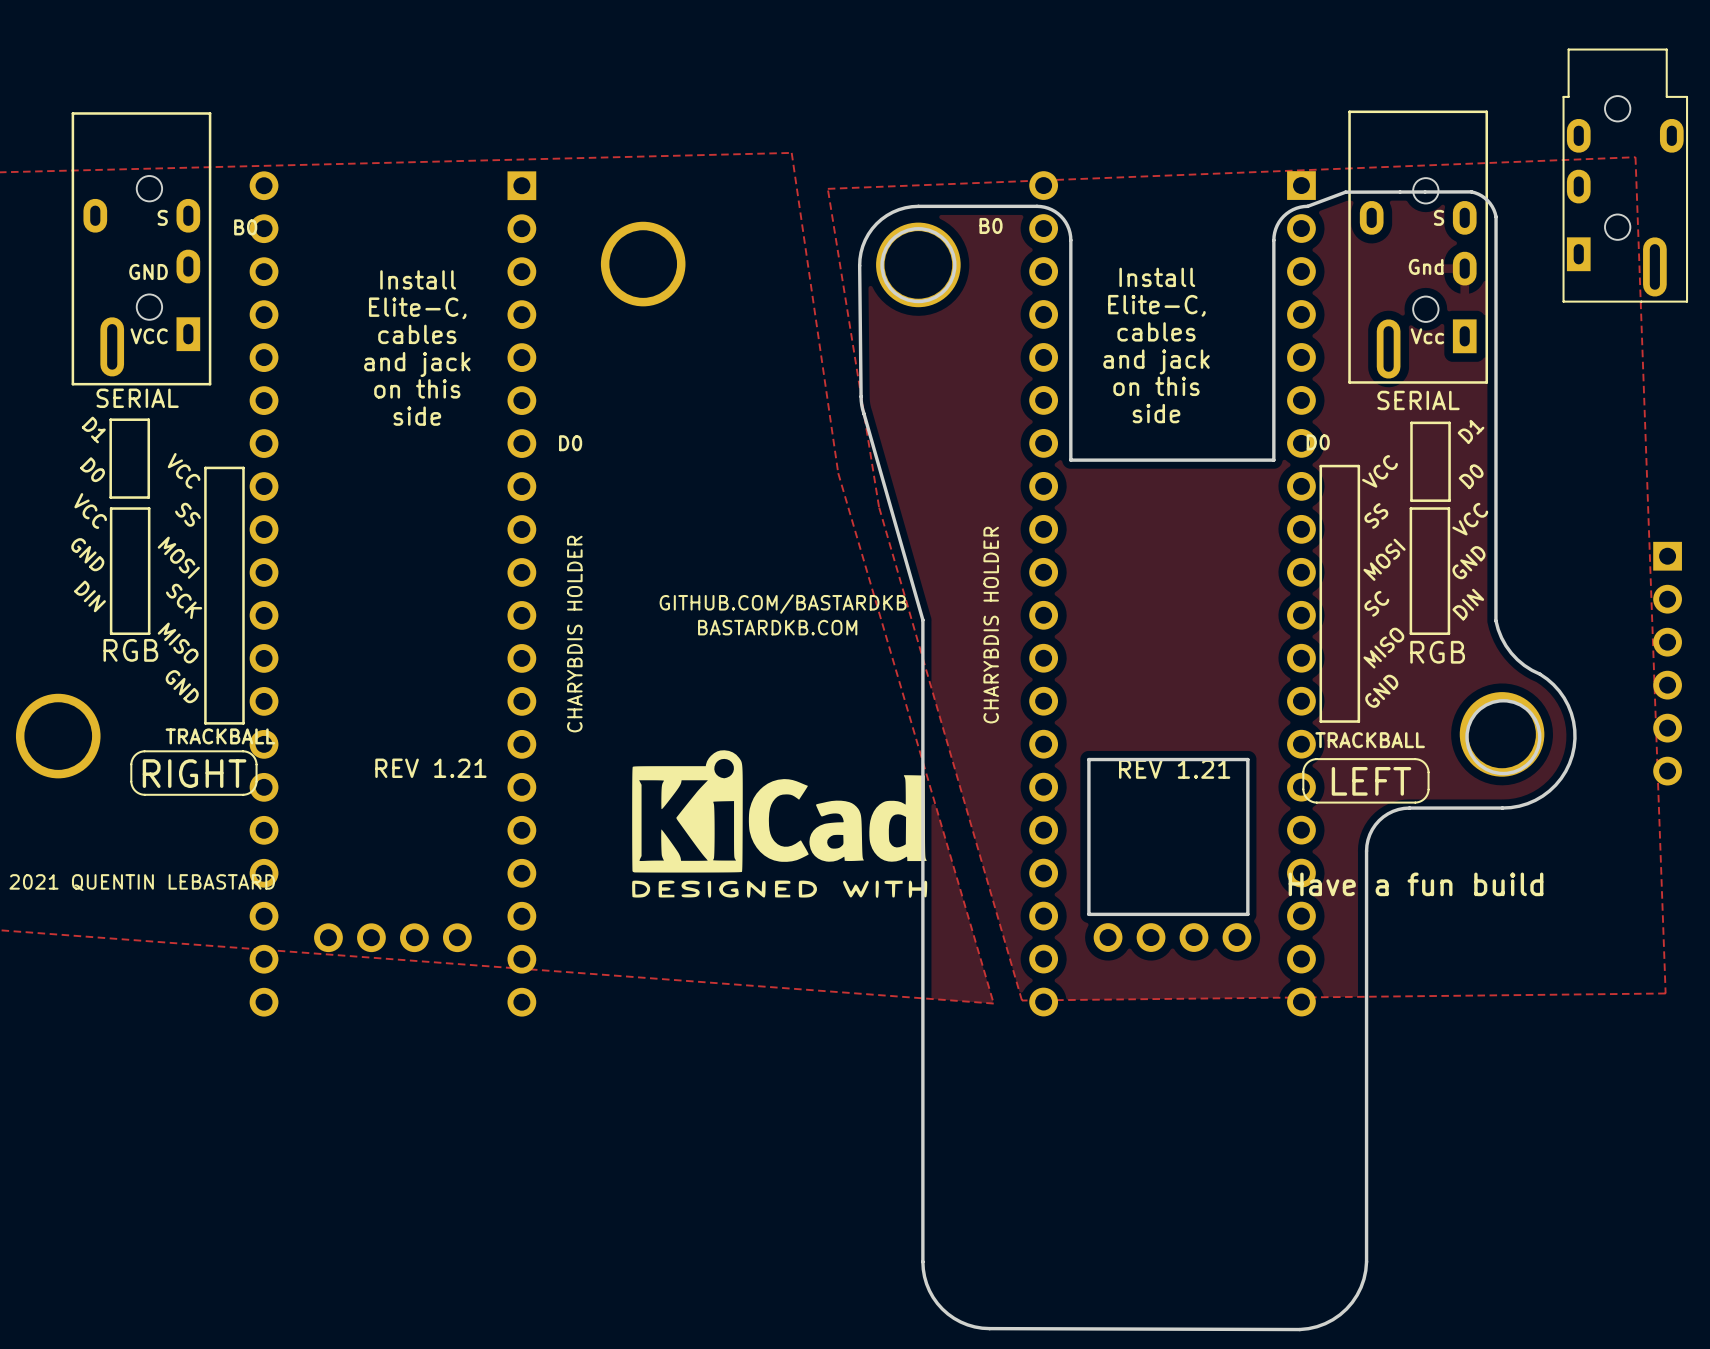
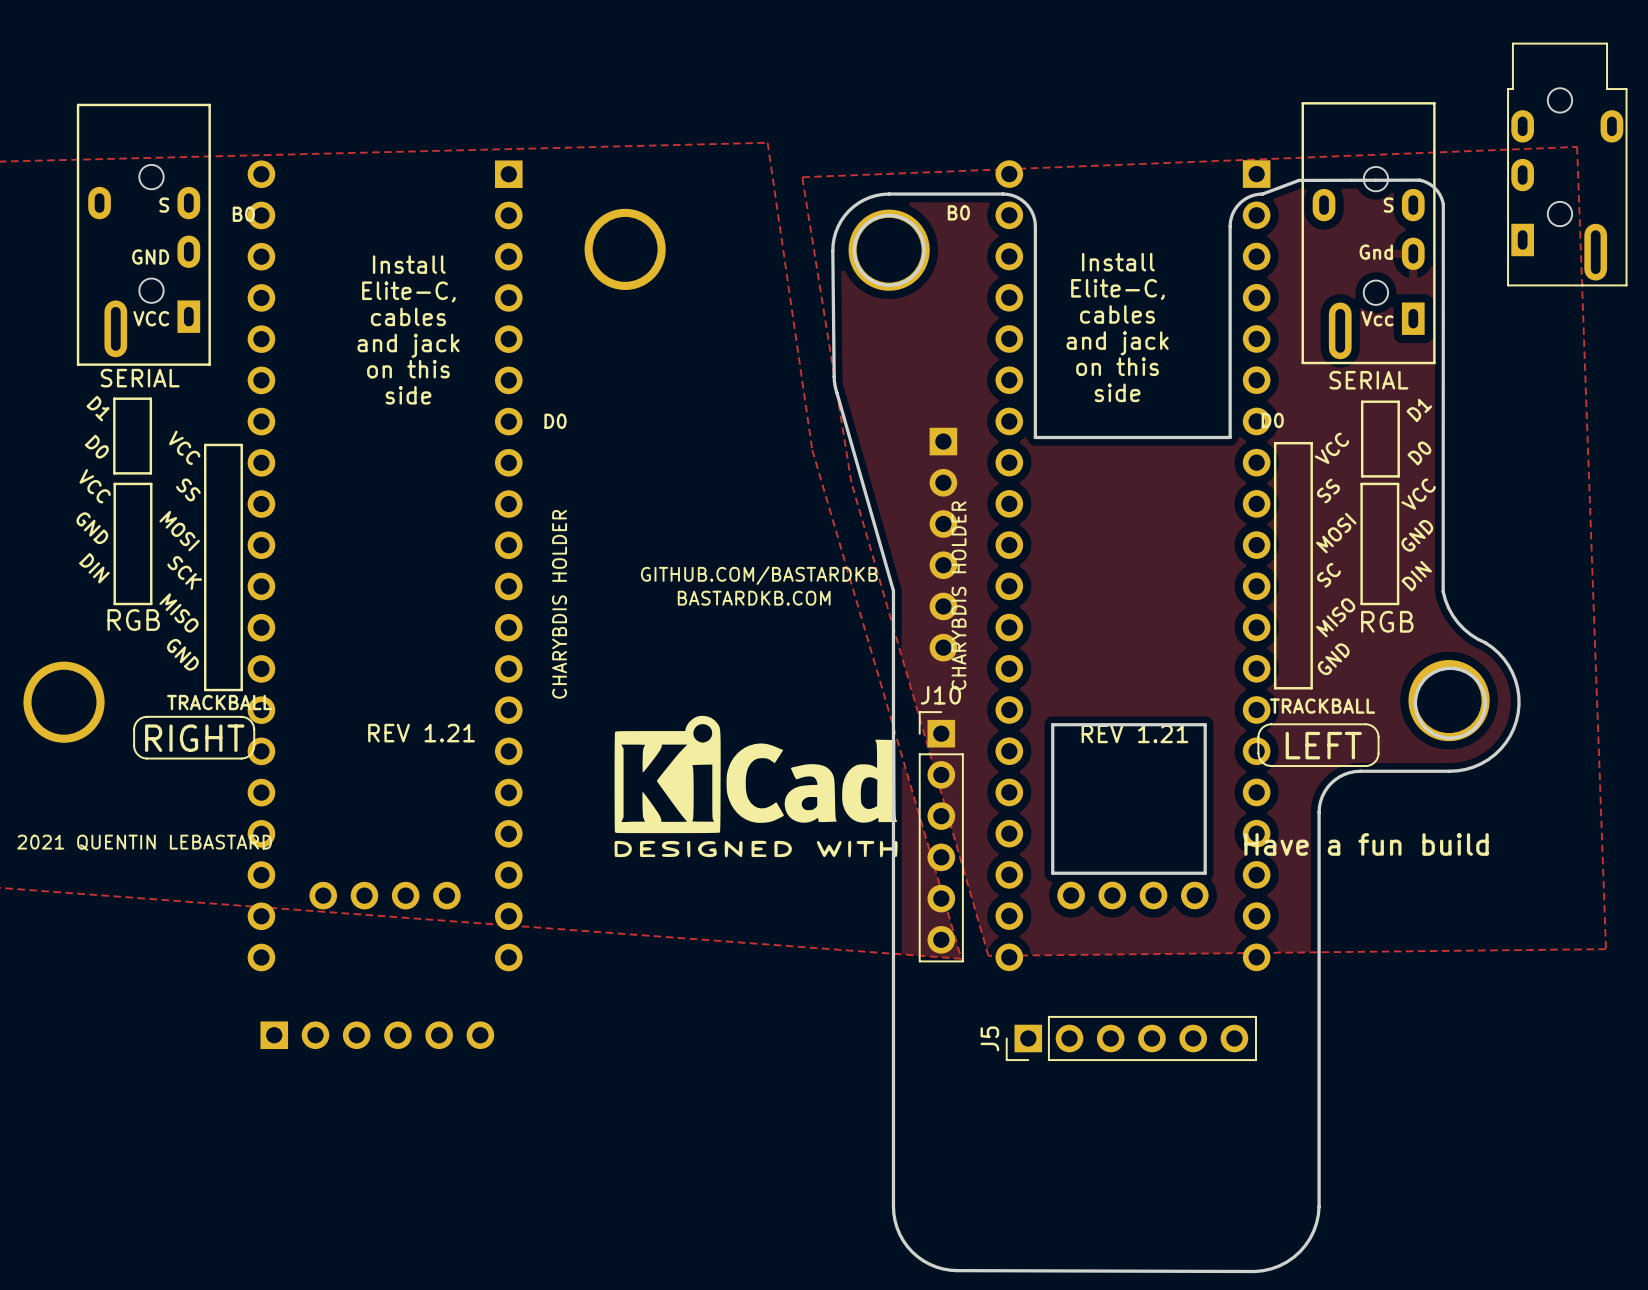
part: none -> (943, 544)
part: (1667, 663) -> none
J10: none -> (941, 836)
part: none -> (377, 1035)
J5: none -> (1131, 1038)

